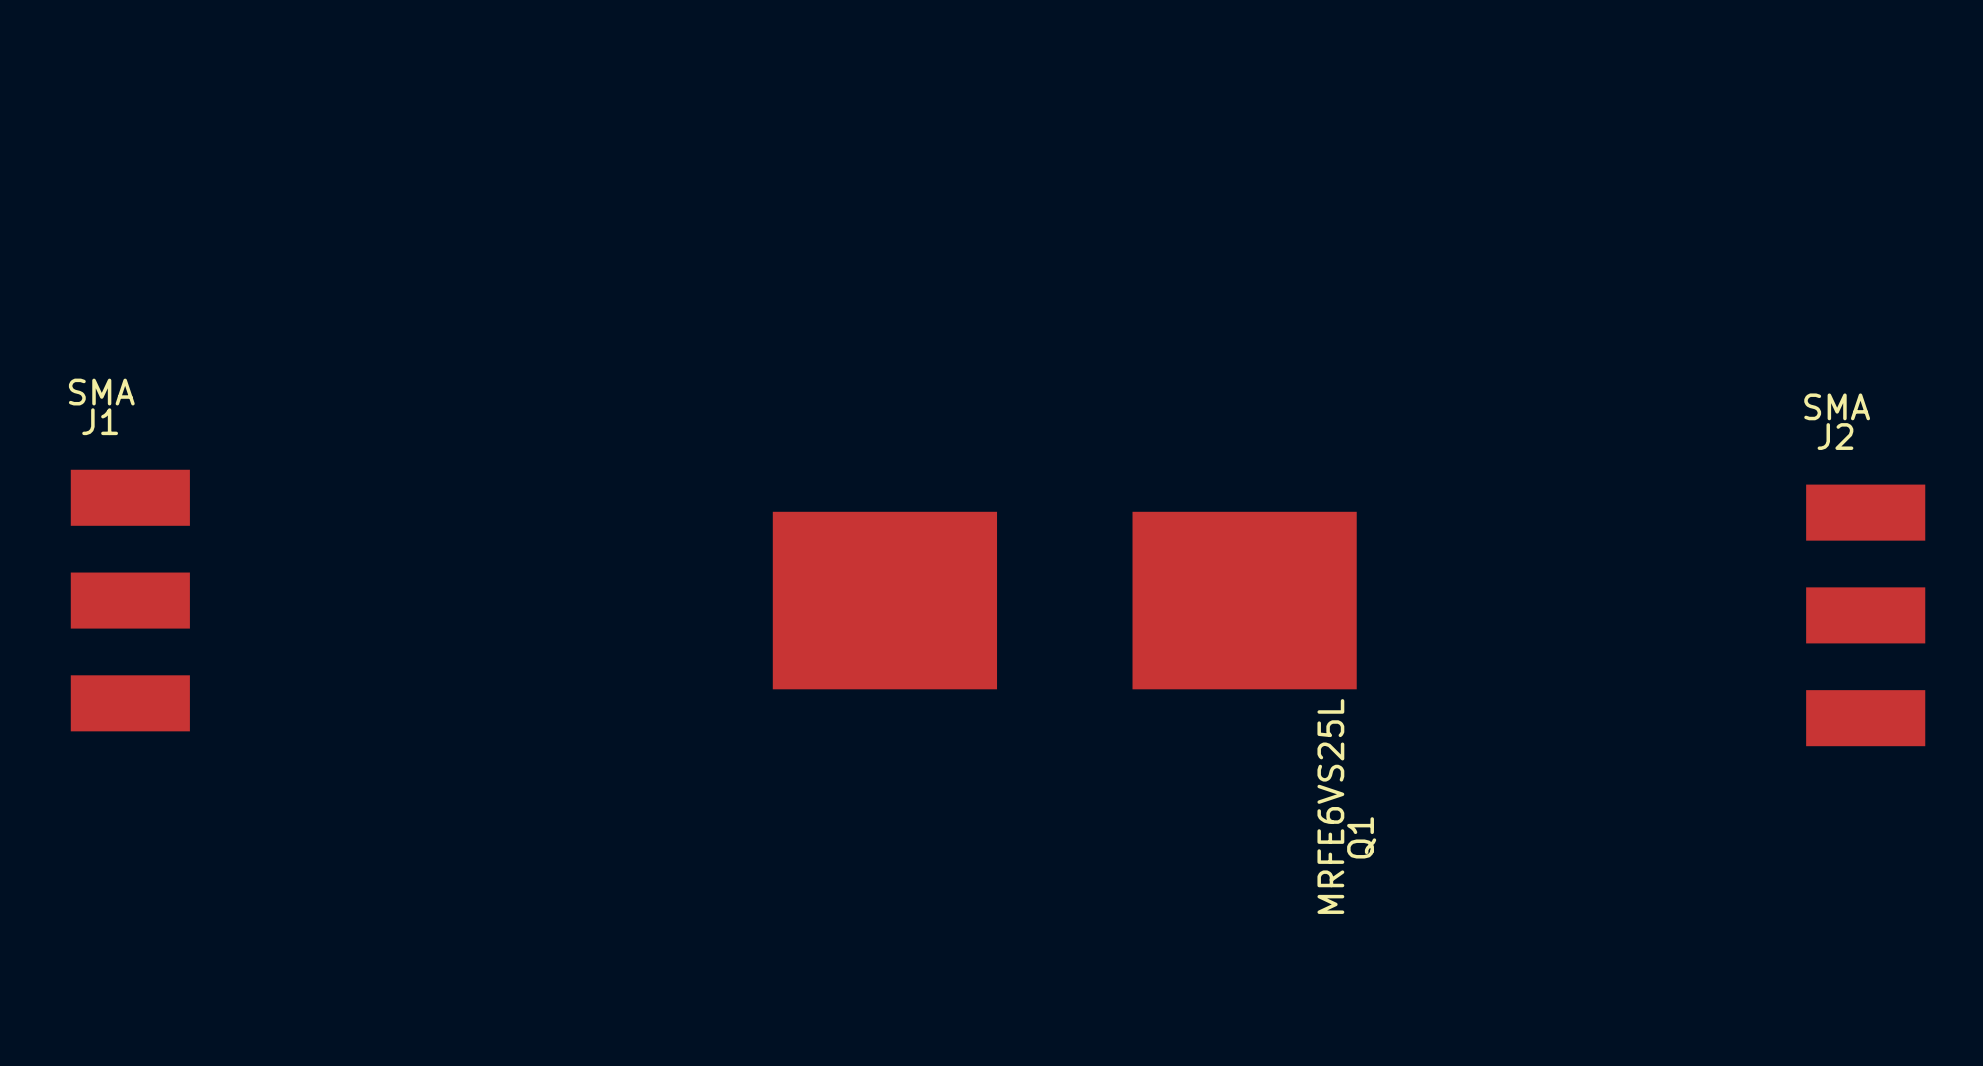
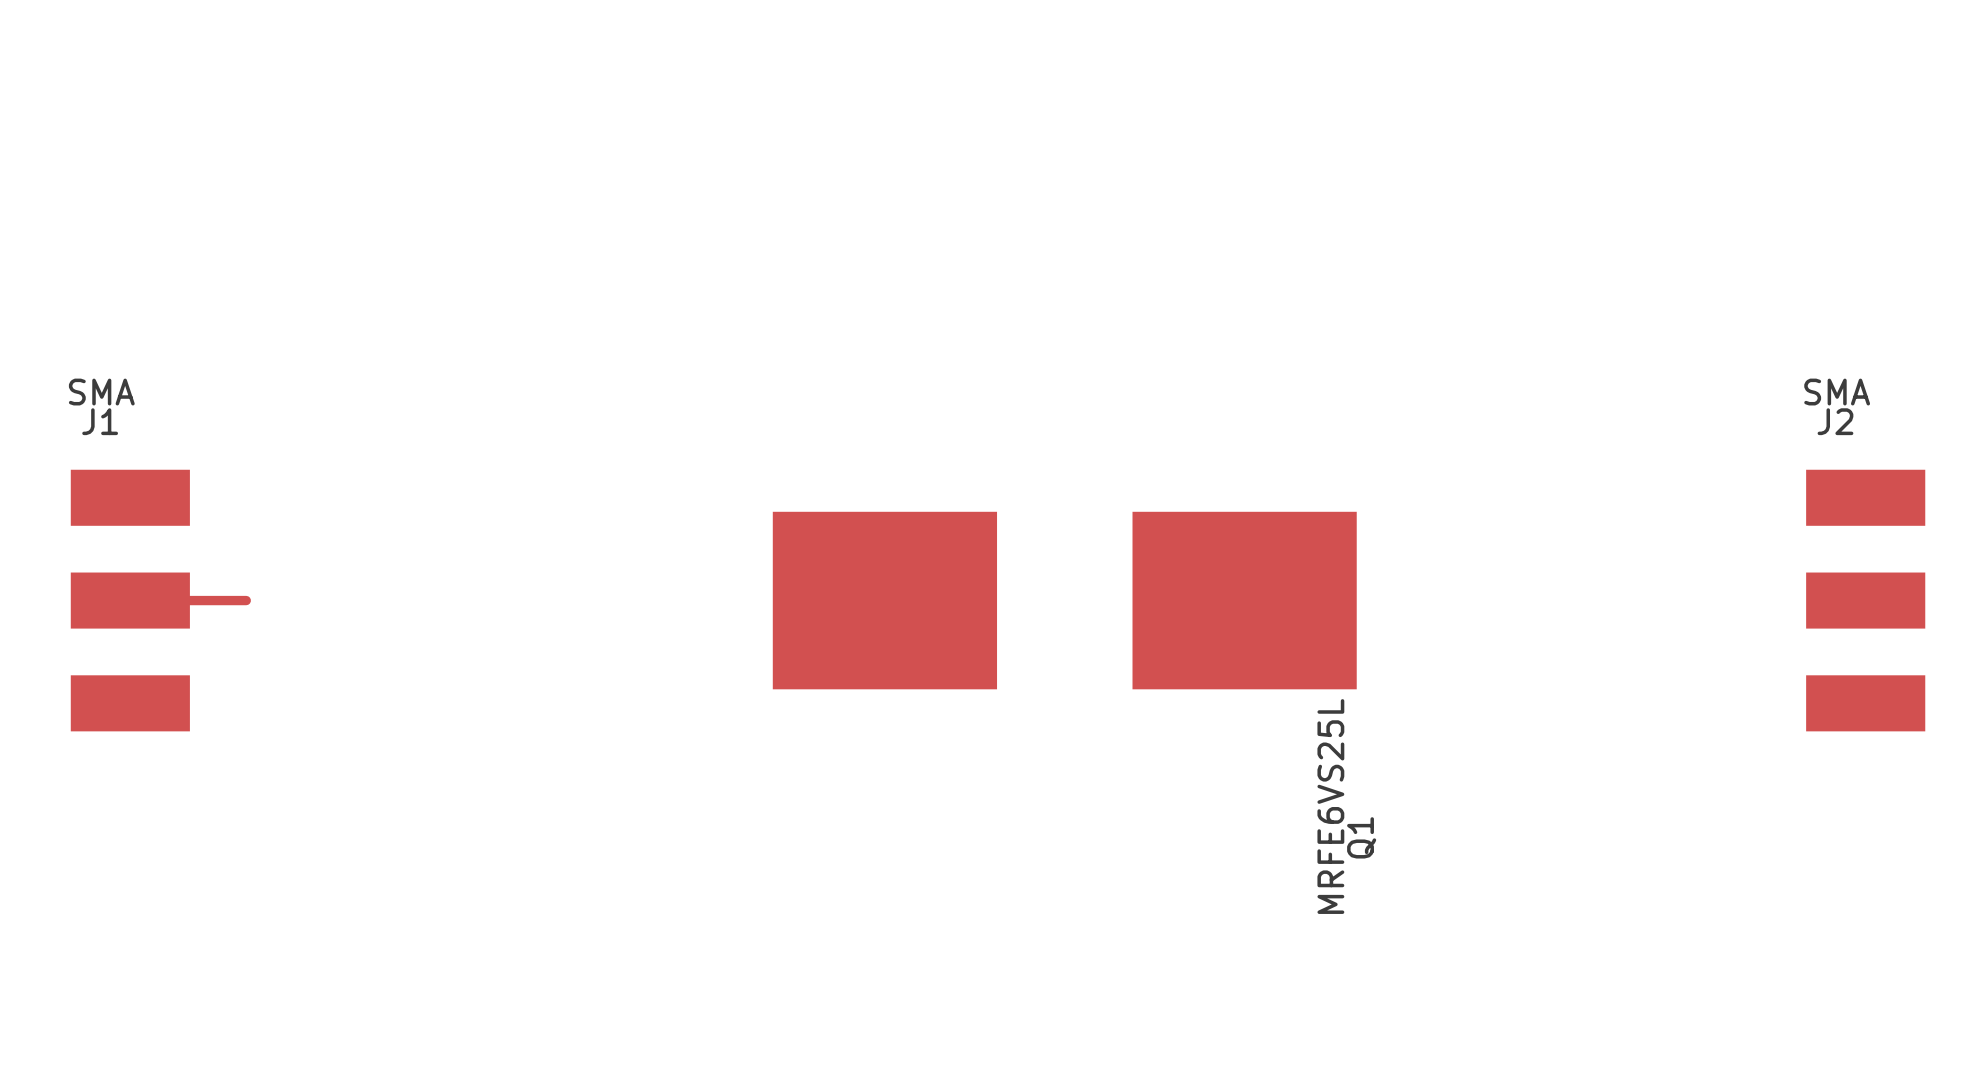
track: none -> (130, 600) (246, 600)
J2 position: (1865, 615) -> (1865, 600)

